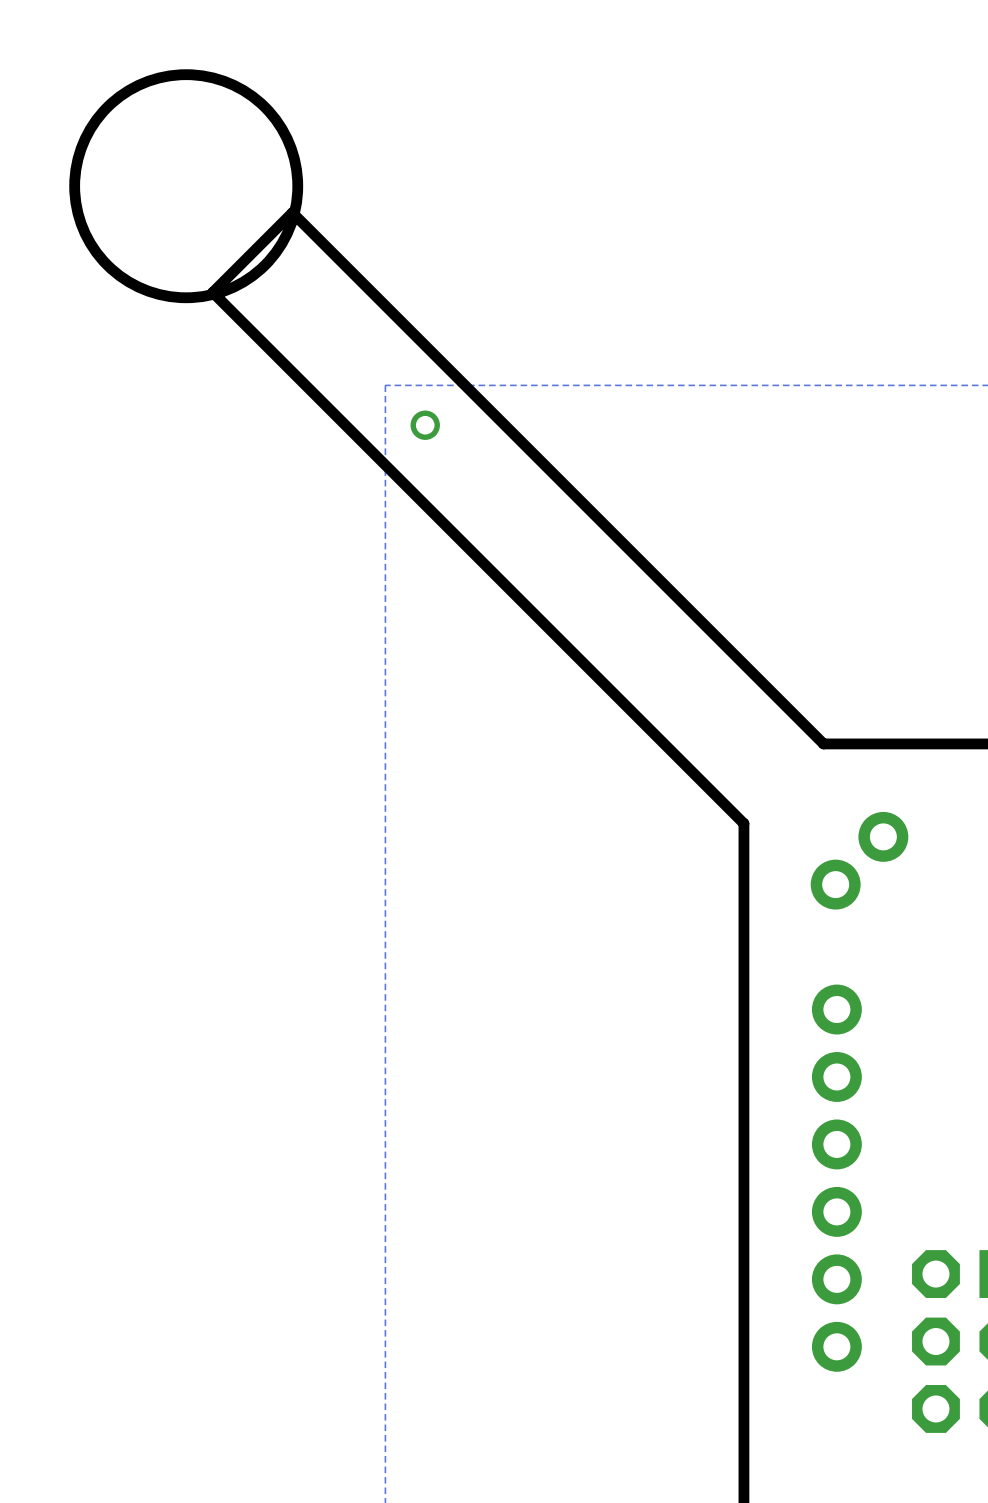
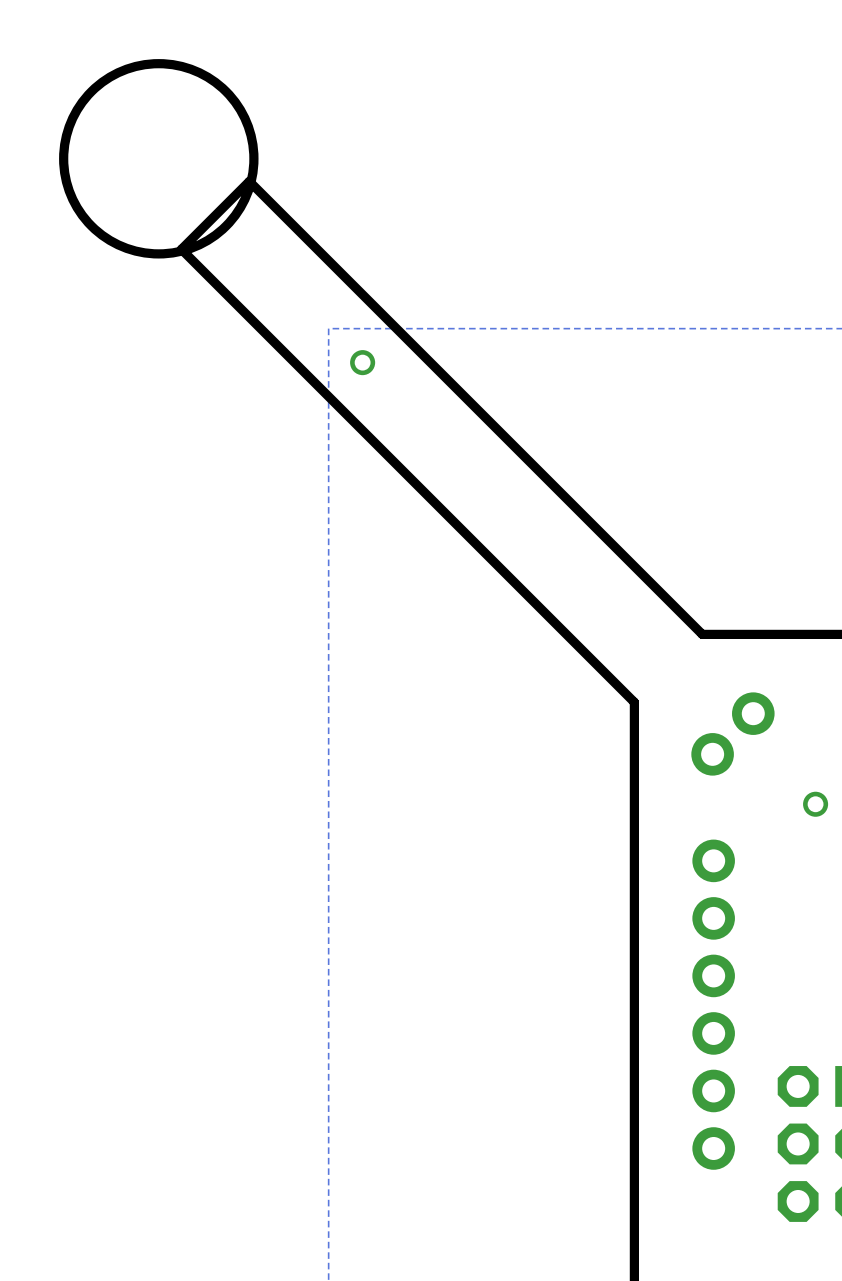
via: none -> (815, 804)

